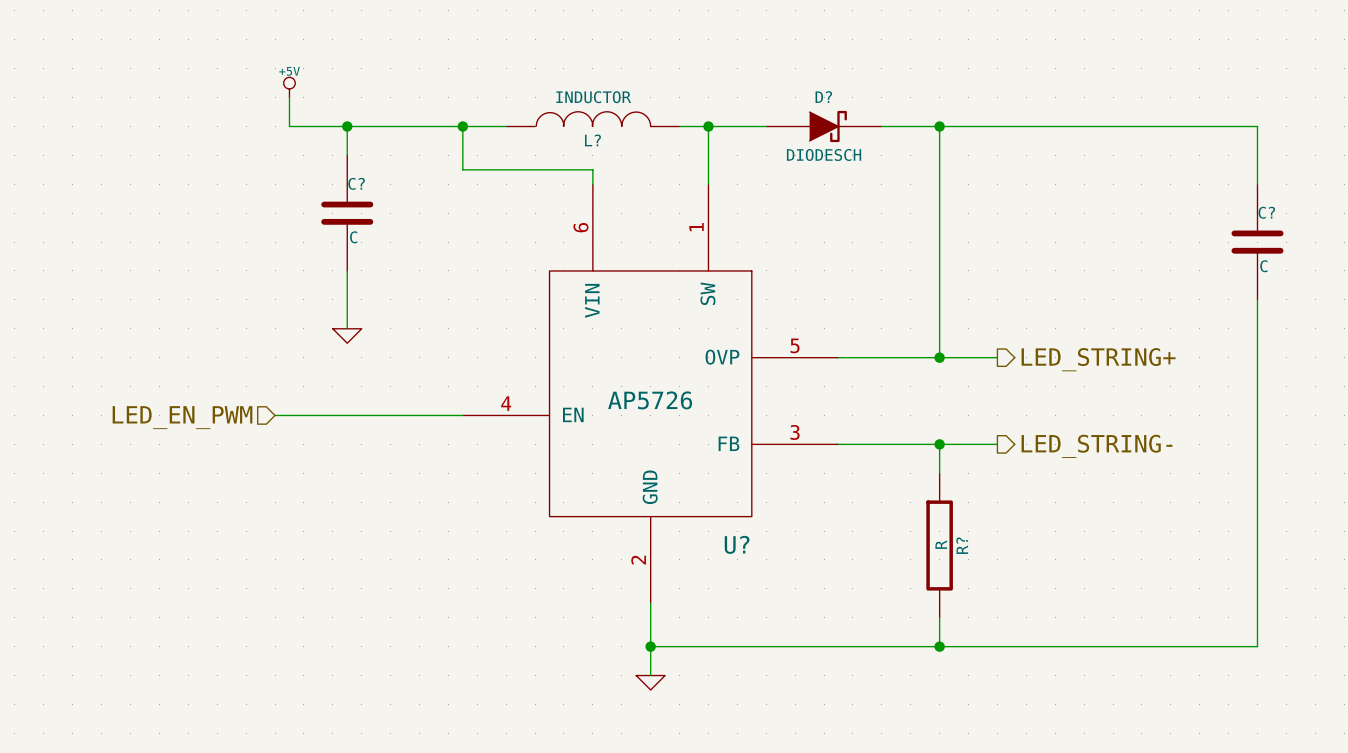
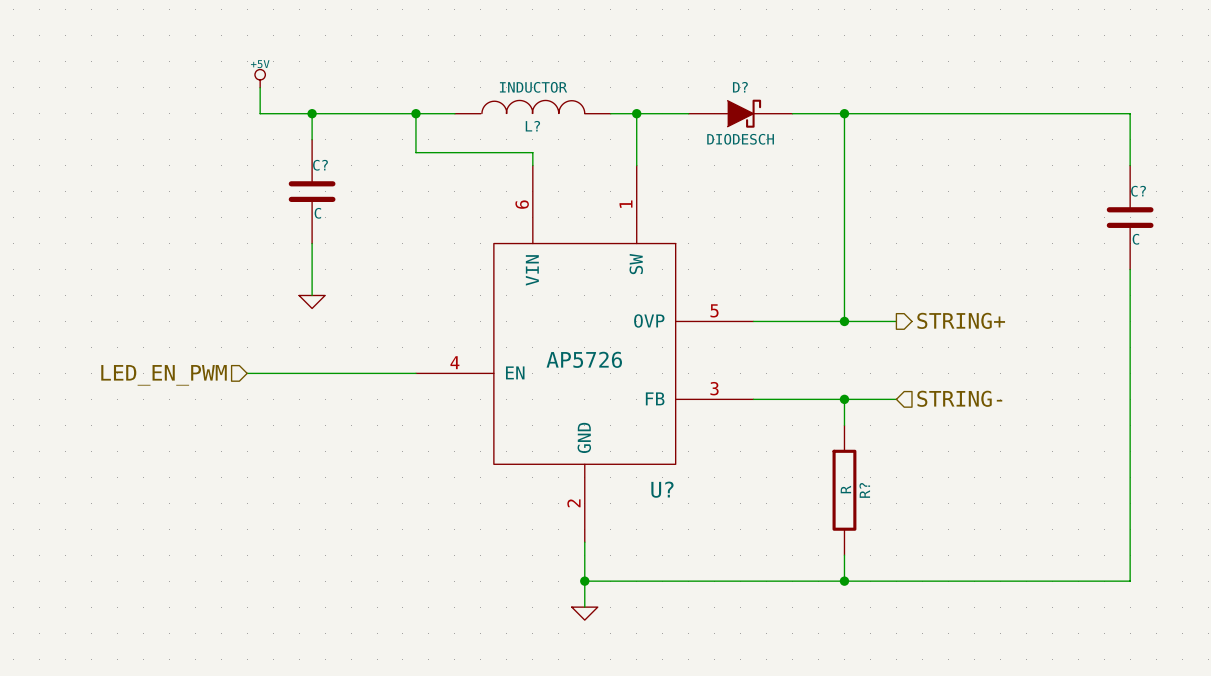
hierarchical label: LED_STRING+ (1098, 359) -> STRING+ (961, 320)
hierarchical label shape: output (1097, 446) -> input (959, 398)
hierarchical label: LED_STRING- (1097, 446) -> STRING- (959, 398)

